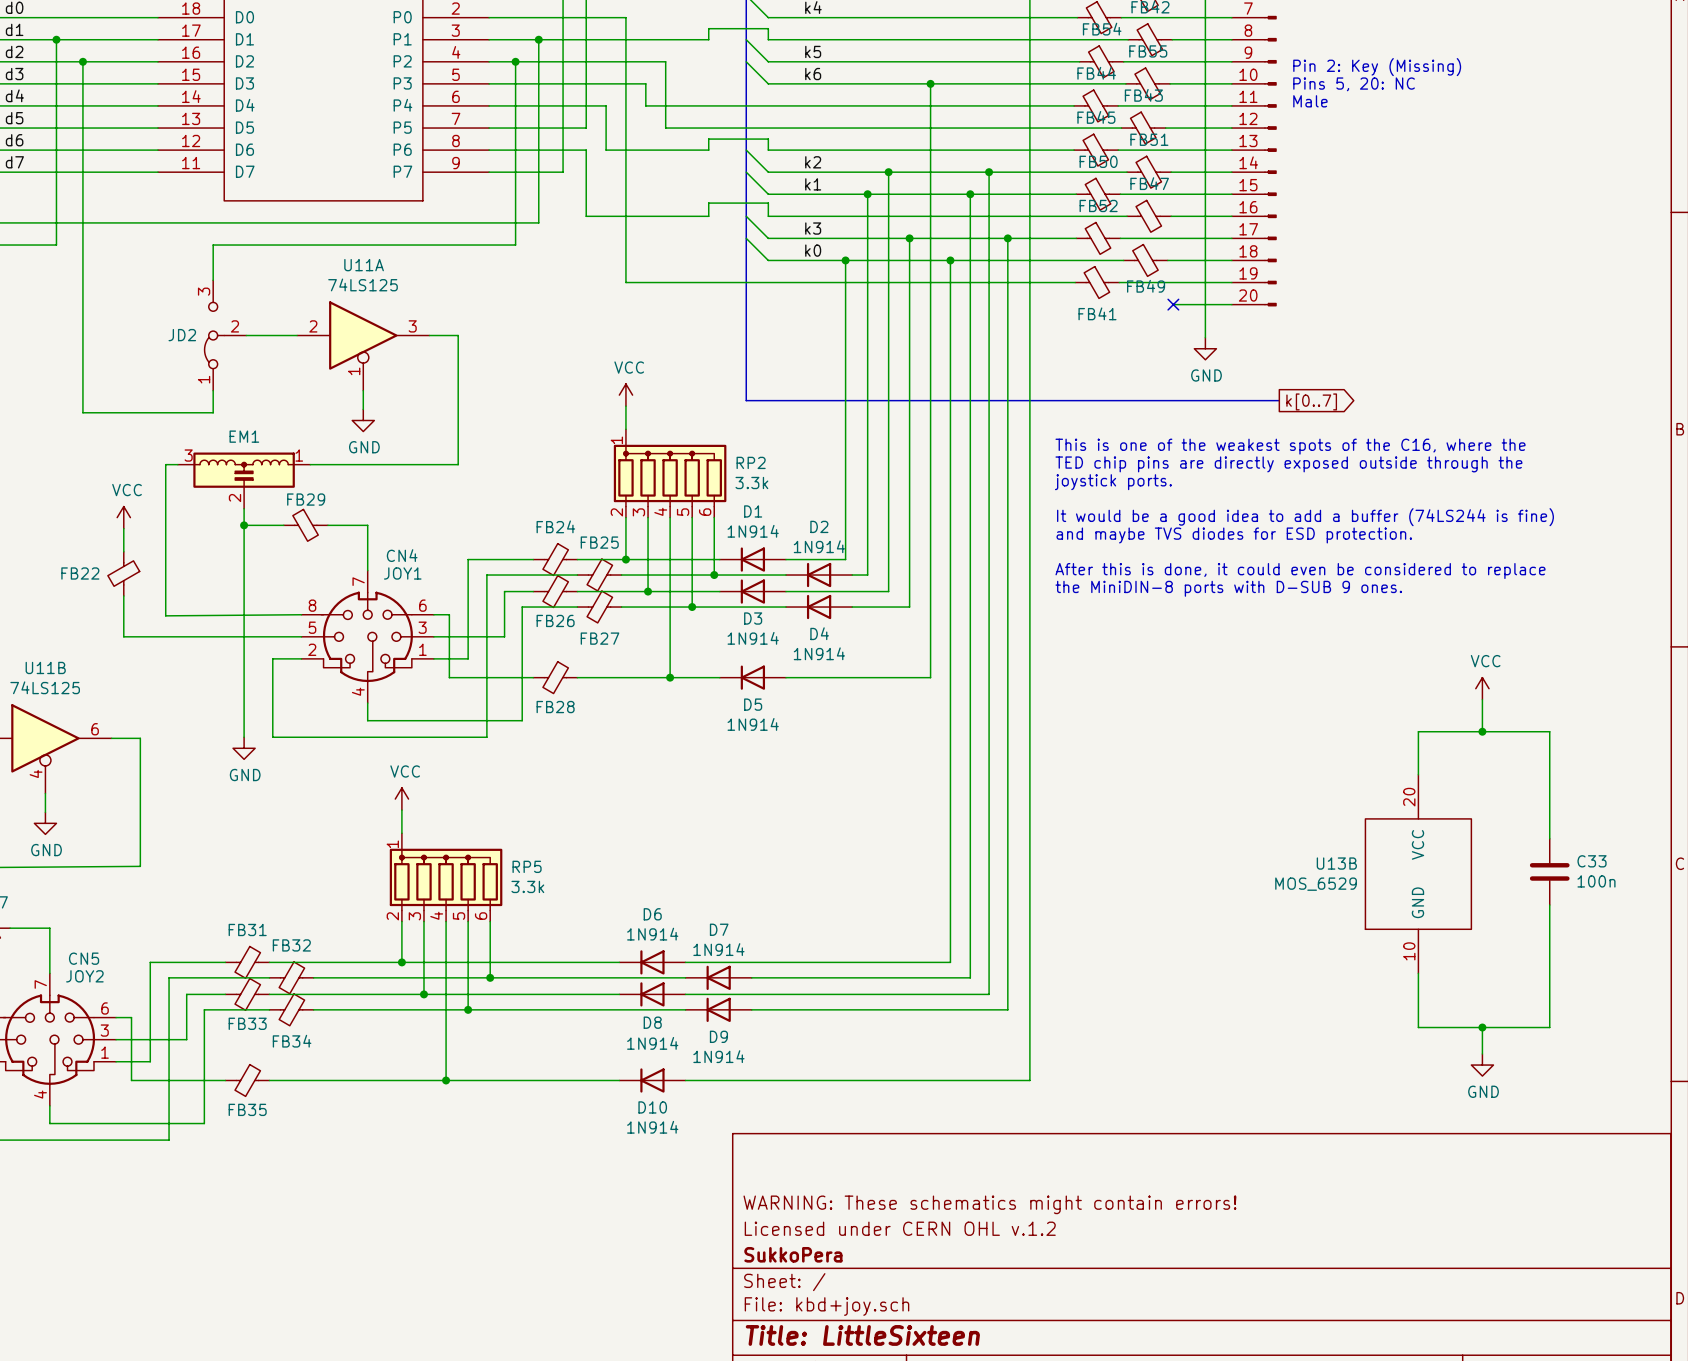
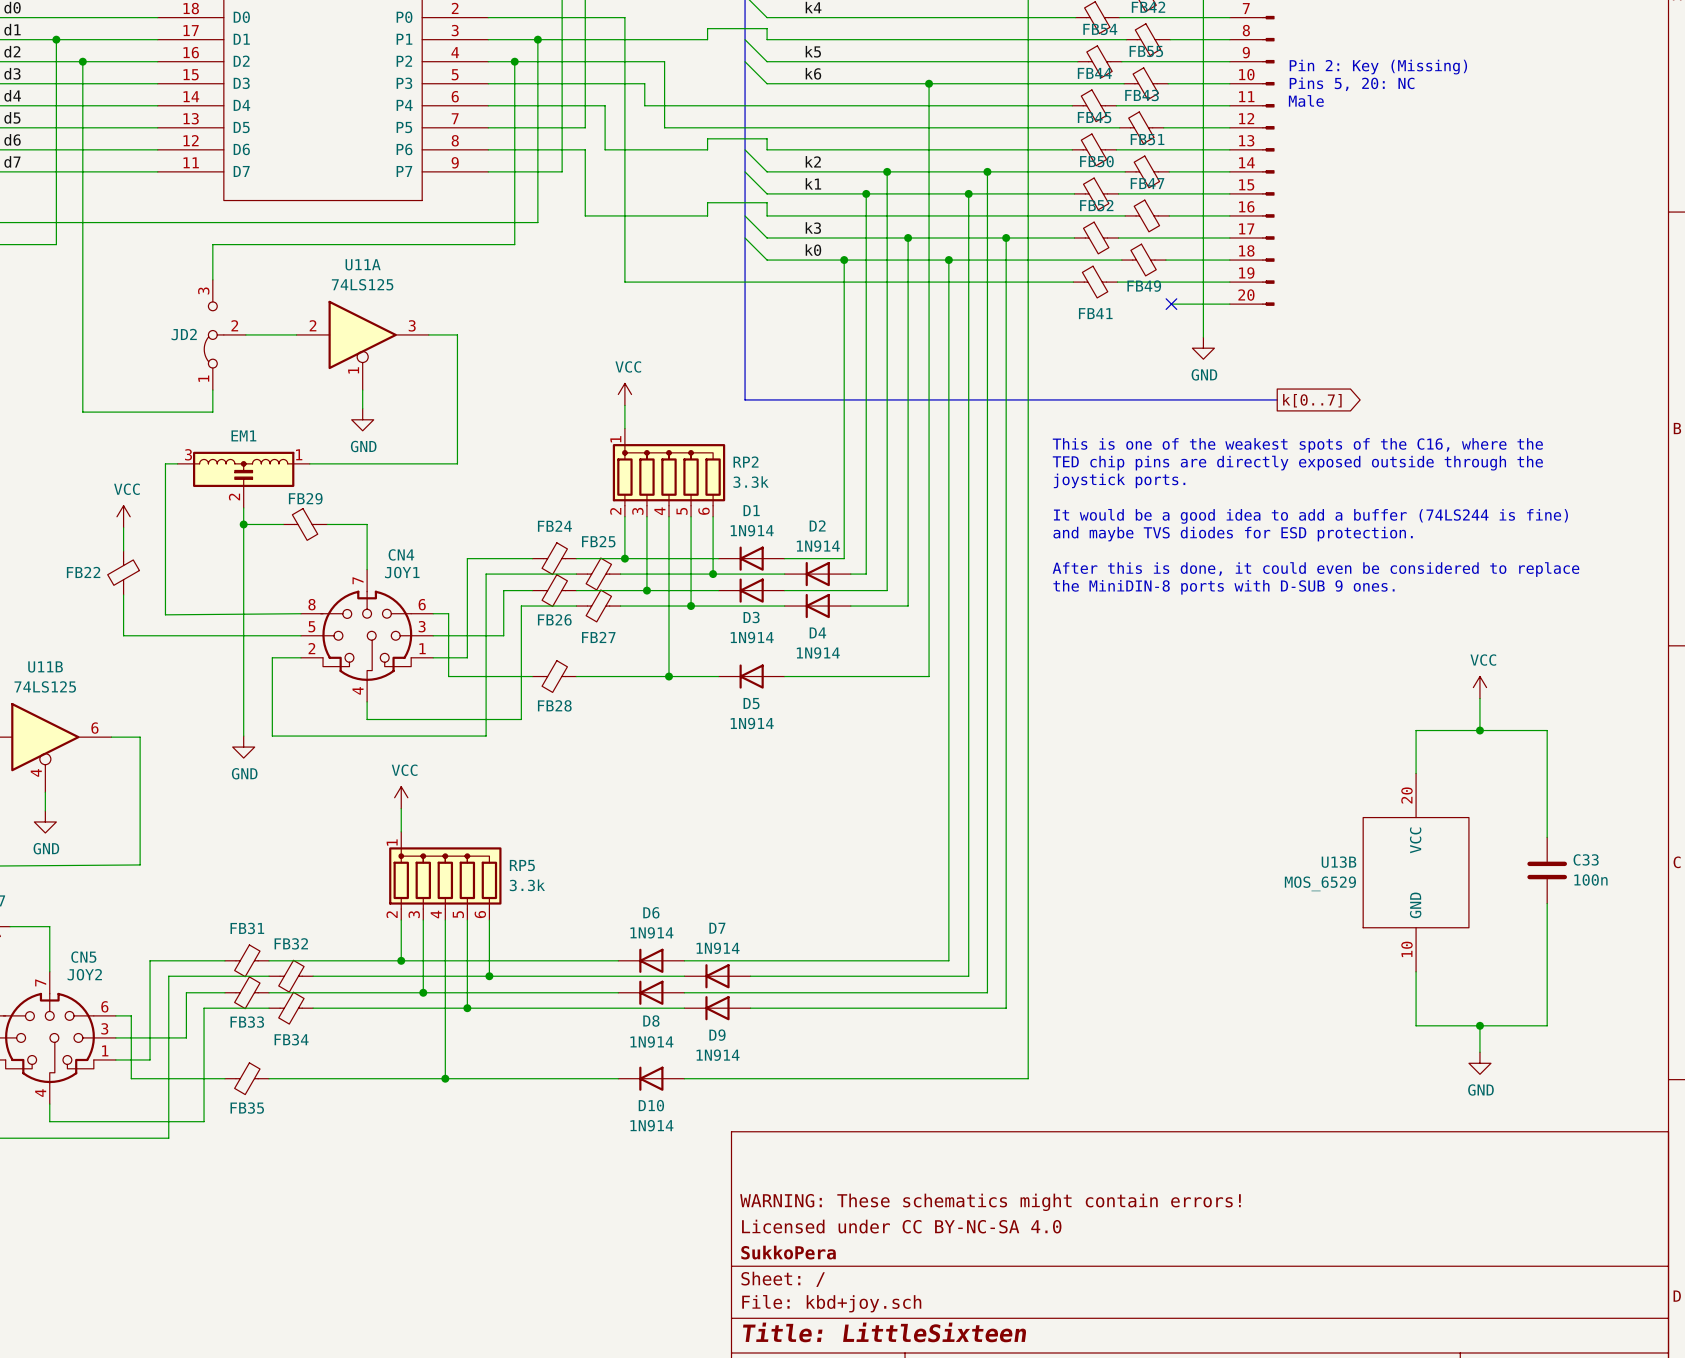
title block: Licensed under CERN OHL v.1.2 (900, 1228) -> Licensed under CC BY-NC-SA 4.0 (901, 1226)

